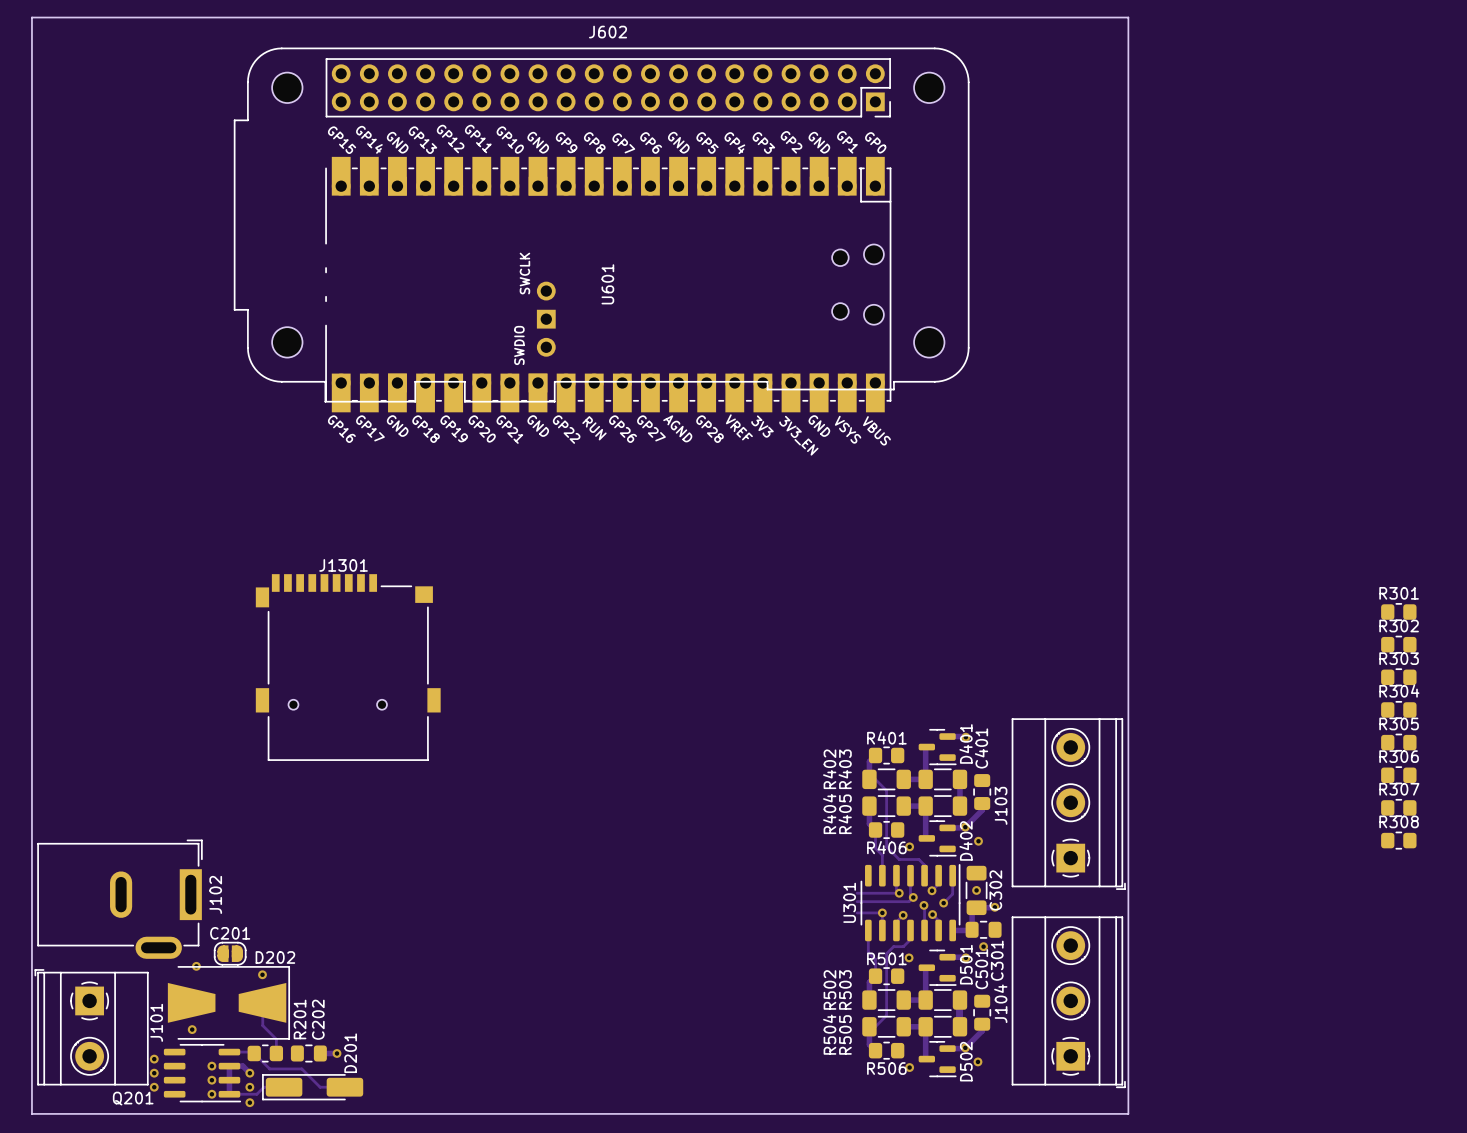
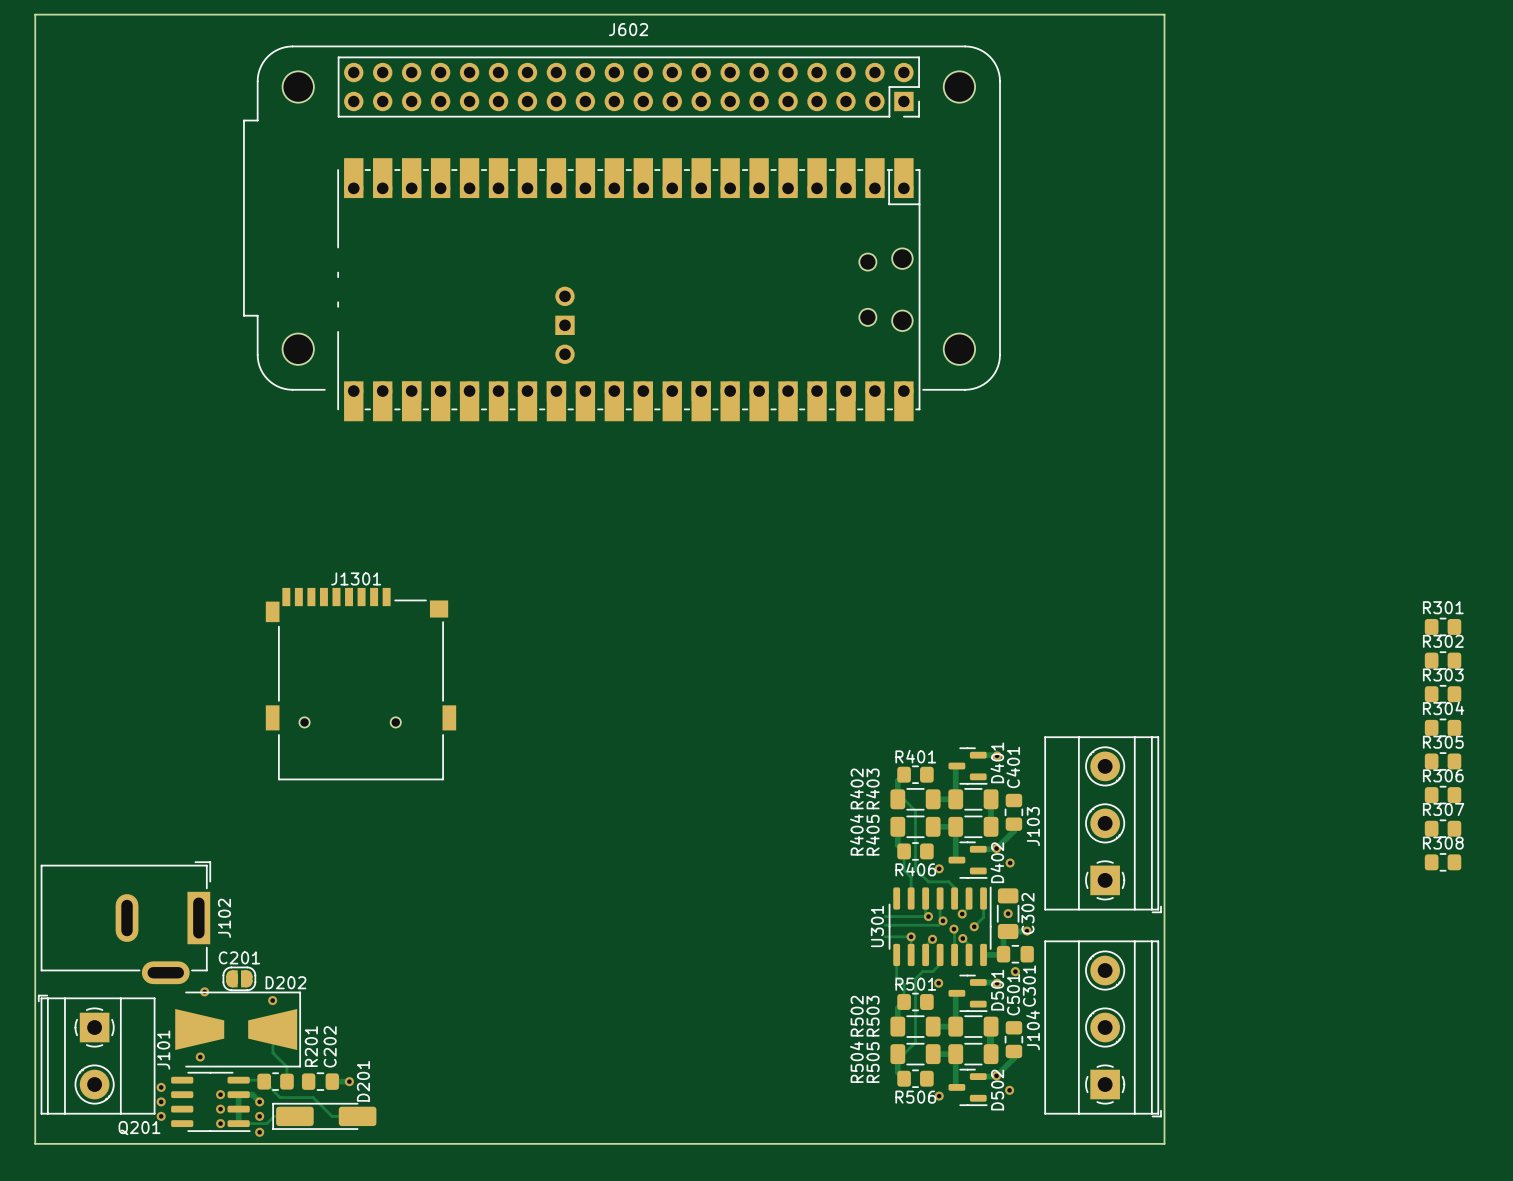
J602 footprint: [233, 47, 970, 403] -> [243, 45, 1001, 391]
U601 footprint: [325, 156, 892, 413] -> [337, 158, 921, 422]
U601 name: U601 (607, 284) -> none

